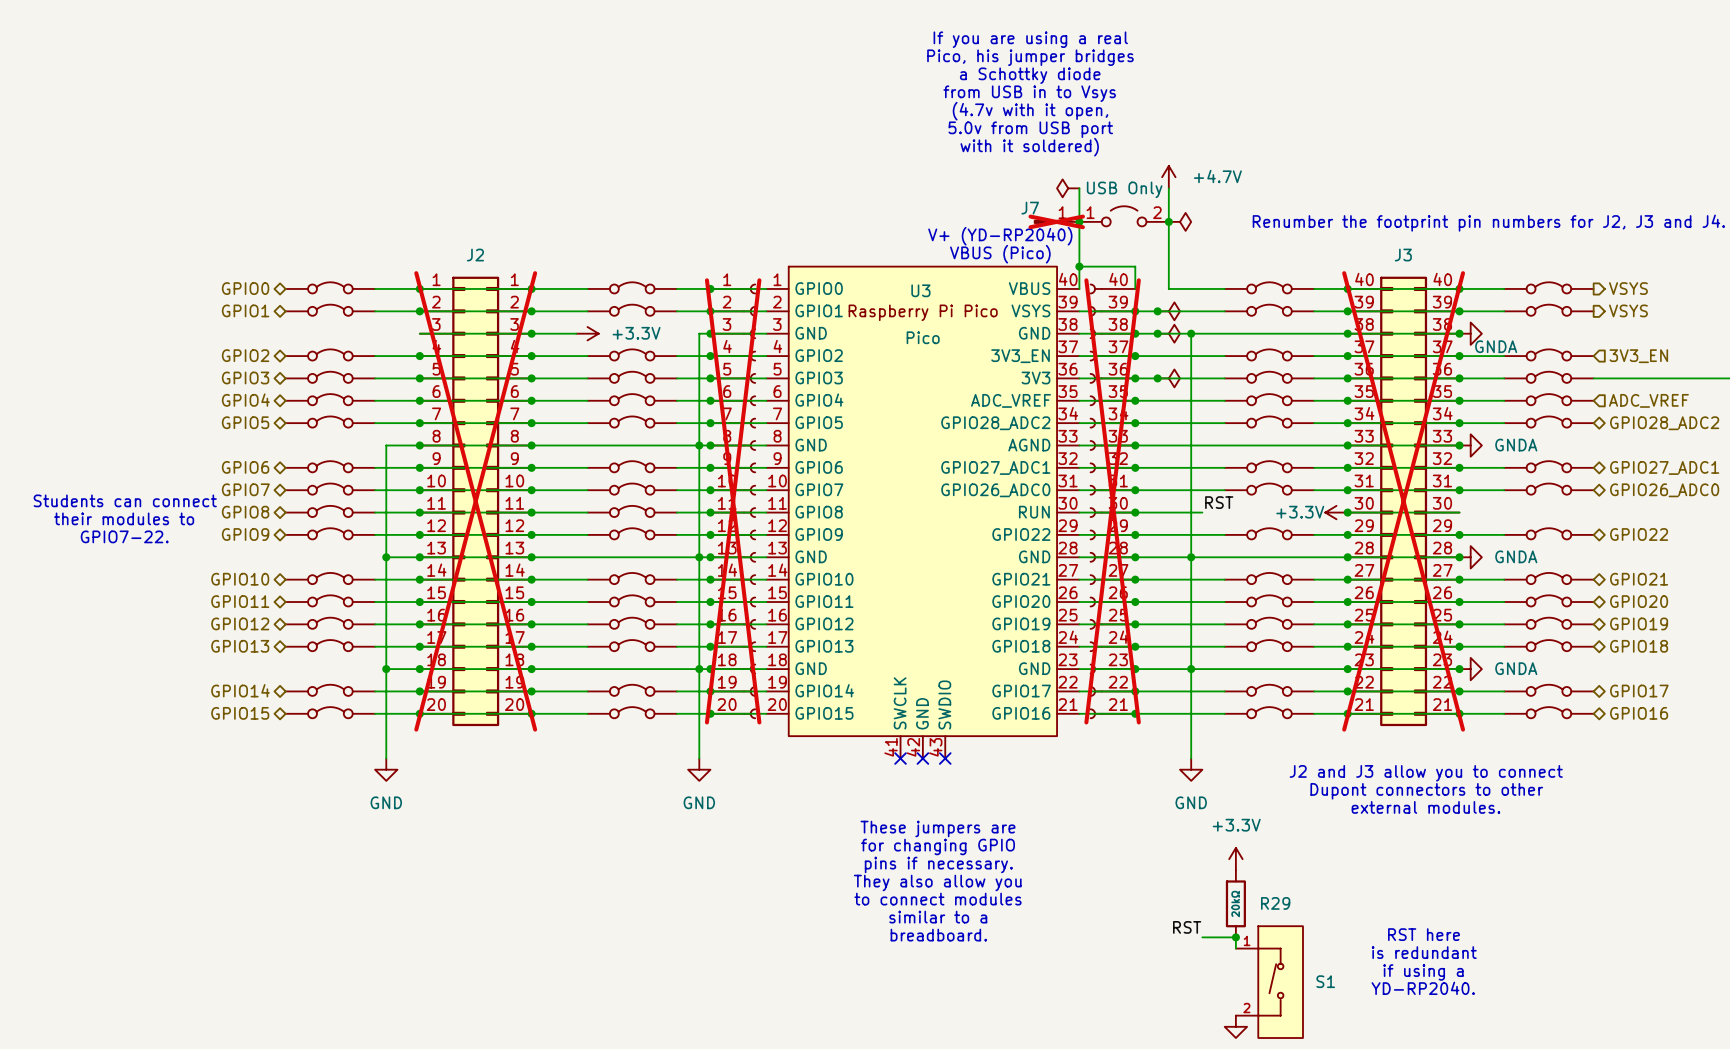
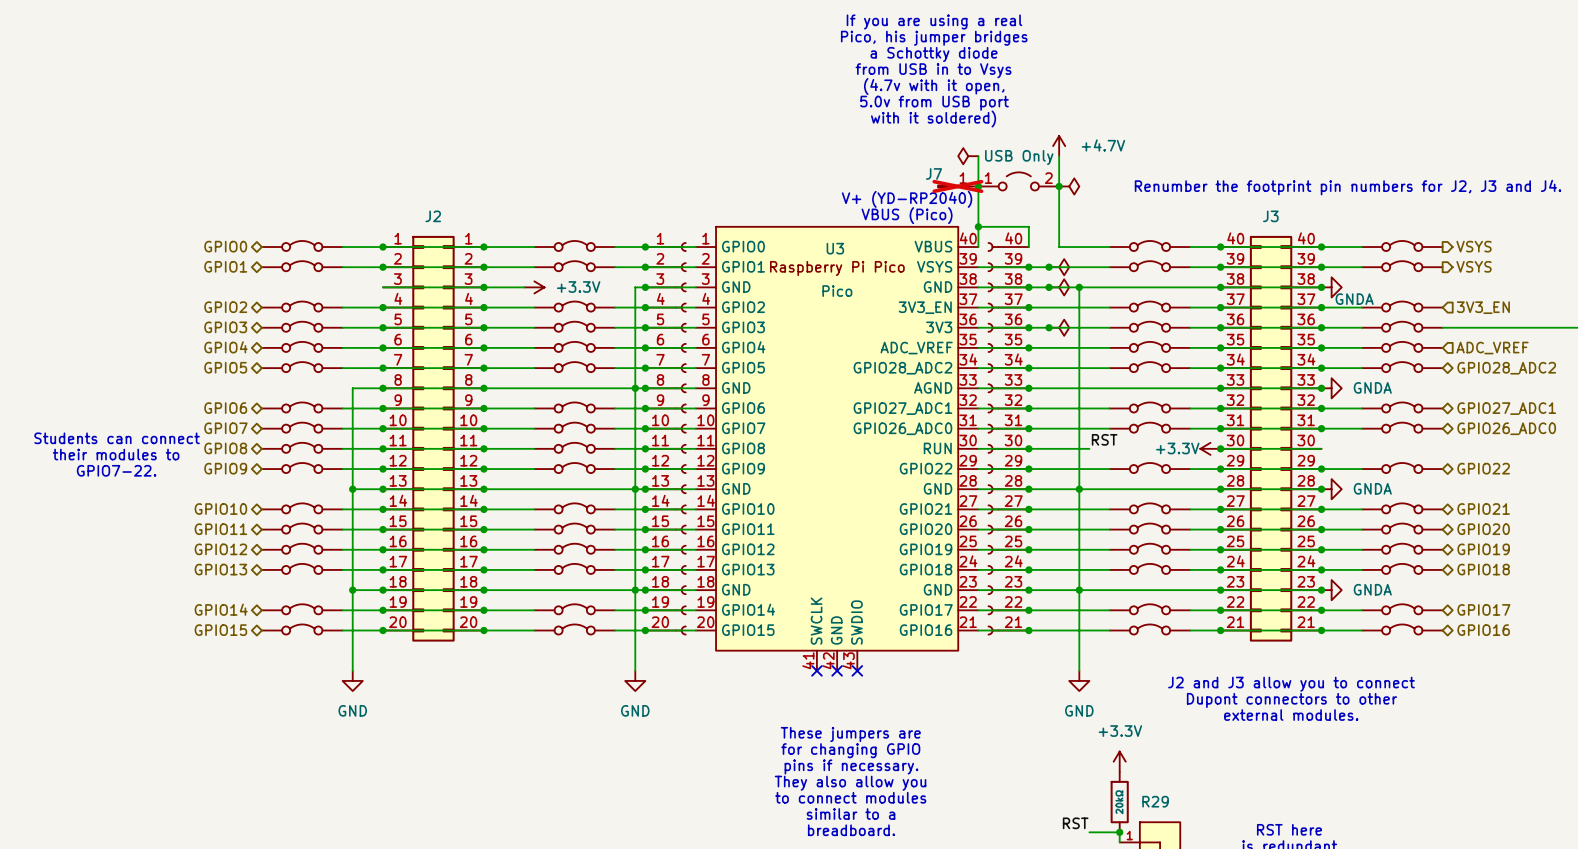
J2 do-not-place cross: (475, 501) -> none
part do-not-place cross: (733, 501) -> none
part do-not-place cross: (1112, 501) -> none
J3 do-not-place cross: (1403, 501) -> none

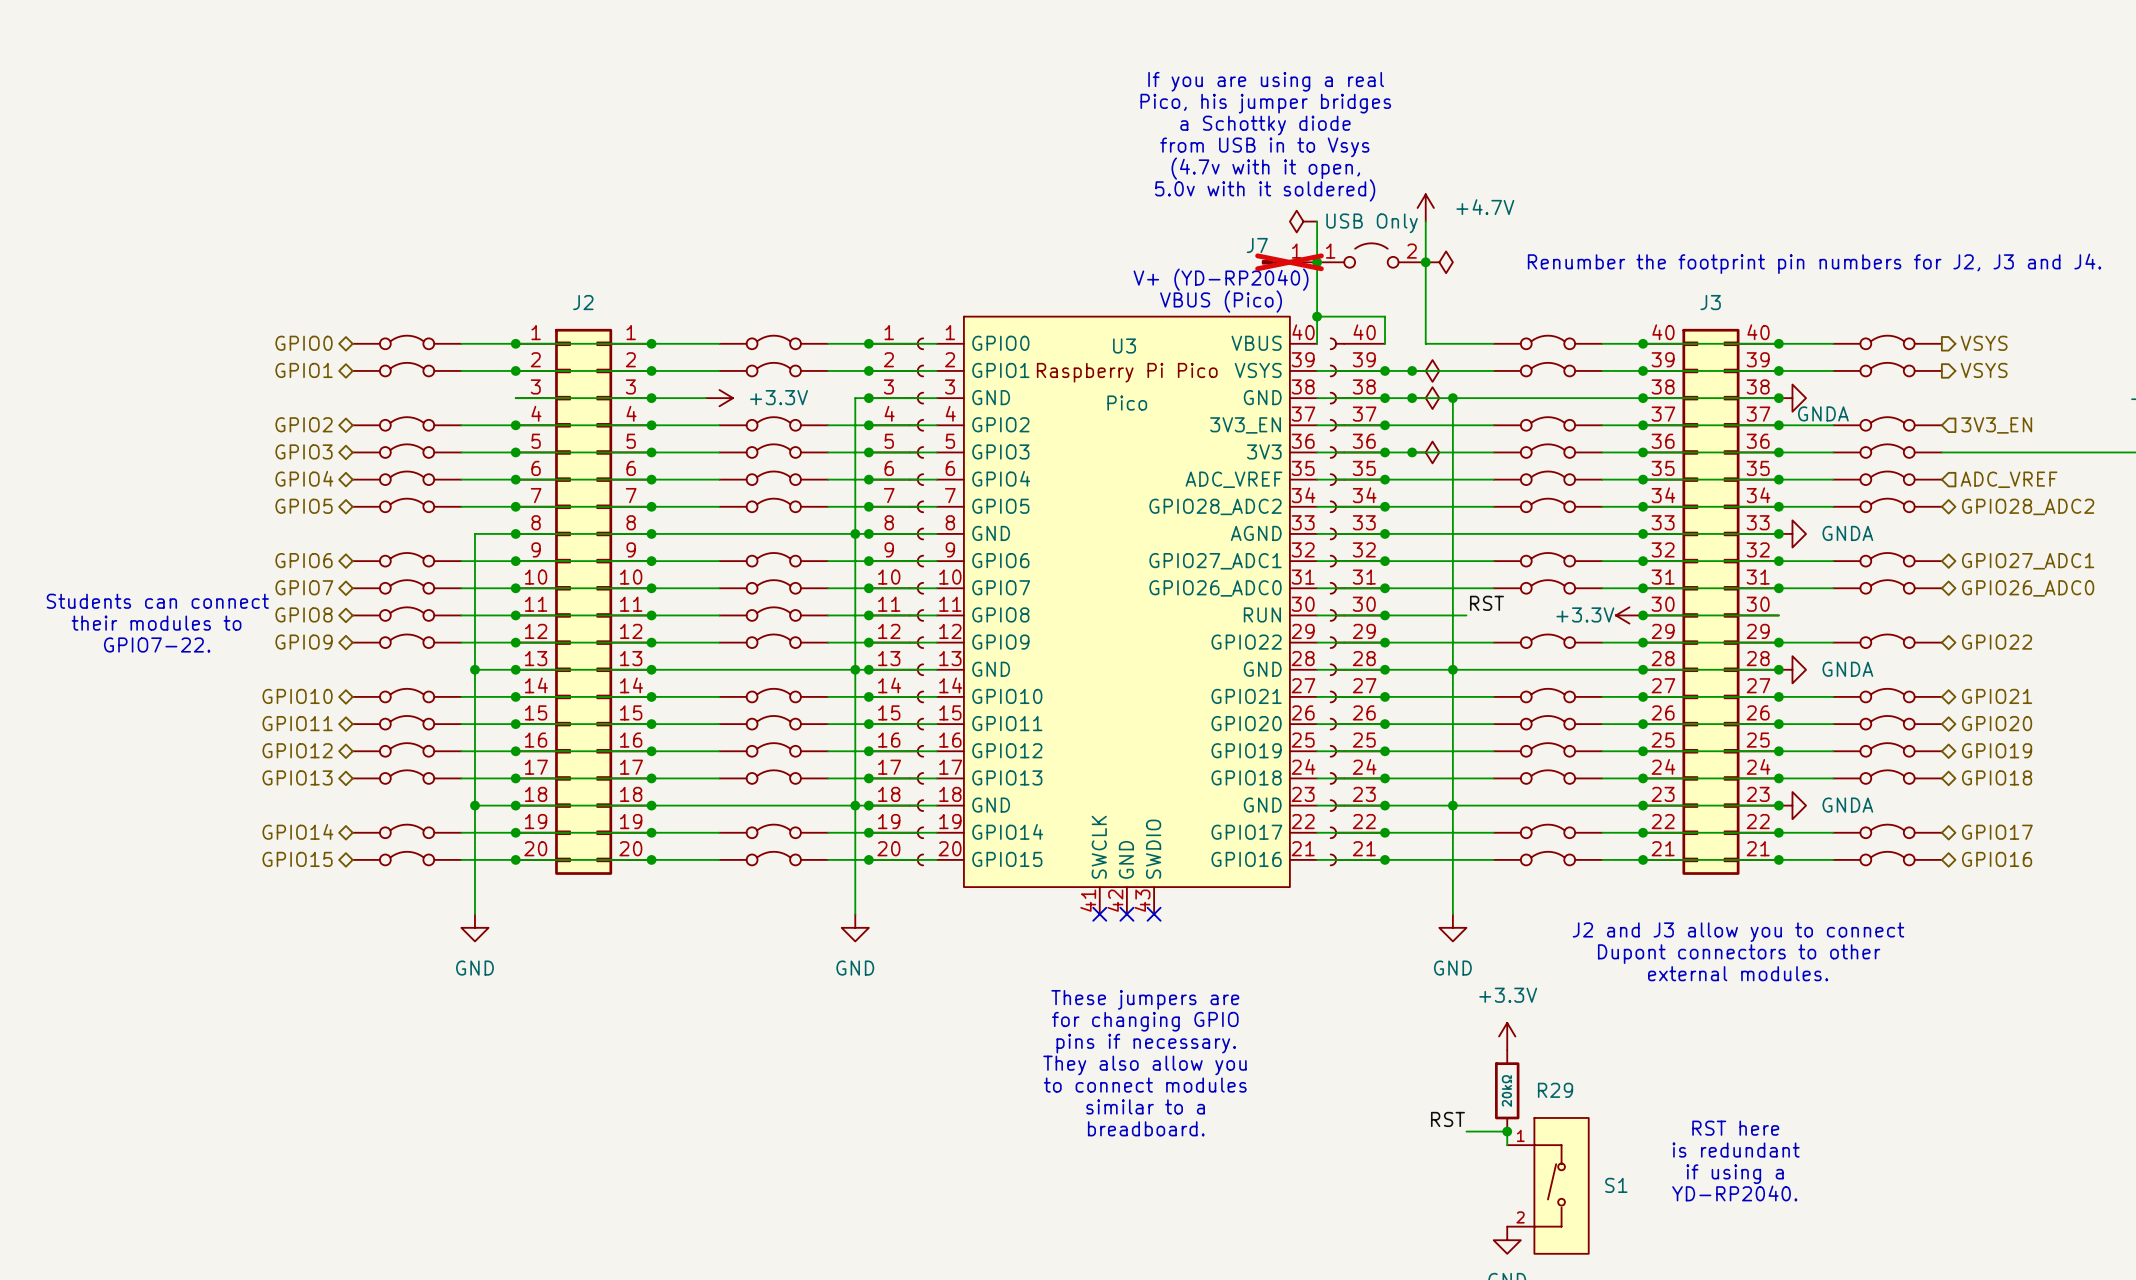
text: If you are using a real (934, 21) -> none
text: Pico, his jumper bridges (934, 38) -> none
text: a Schottky diode (934, 54) -> If you are using a real (1266, 81)
text: from USB in to Vsys (933, 70) -> Pico, his jumper bridges (1265, 103)
text: (4.7v with it open, (934, 86) -> a Schottky diode (1265, 125)
text: 5.0v from USB port (934, 103) -> from USB in to Vsys (1264, 147)
text: with it soldered) (933, 119) -> (4.7v with it open, (1265, 168)
text: none -> 5.0v with it soldered) (1265, 190)

